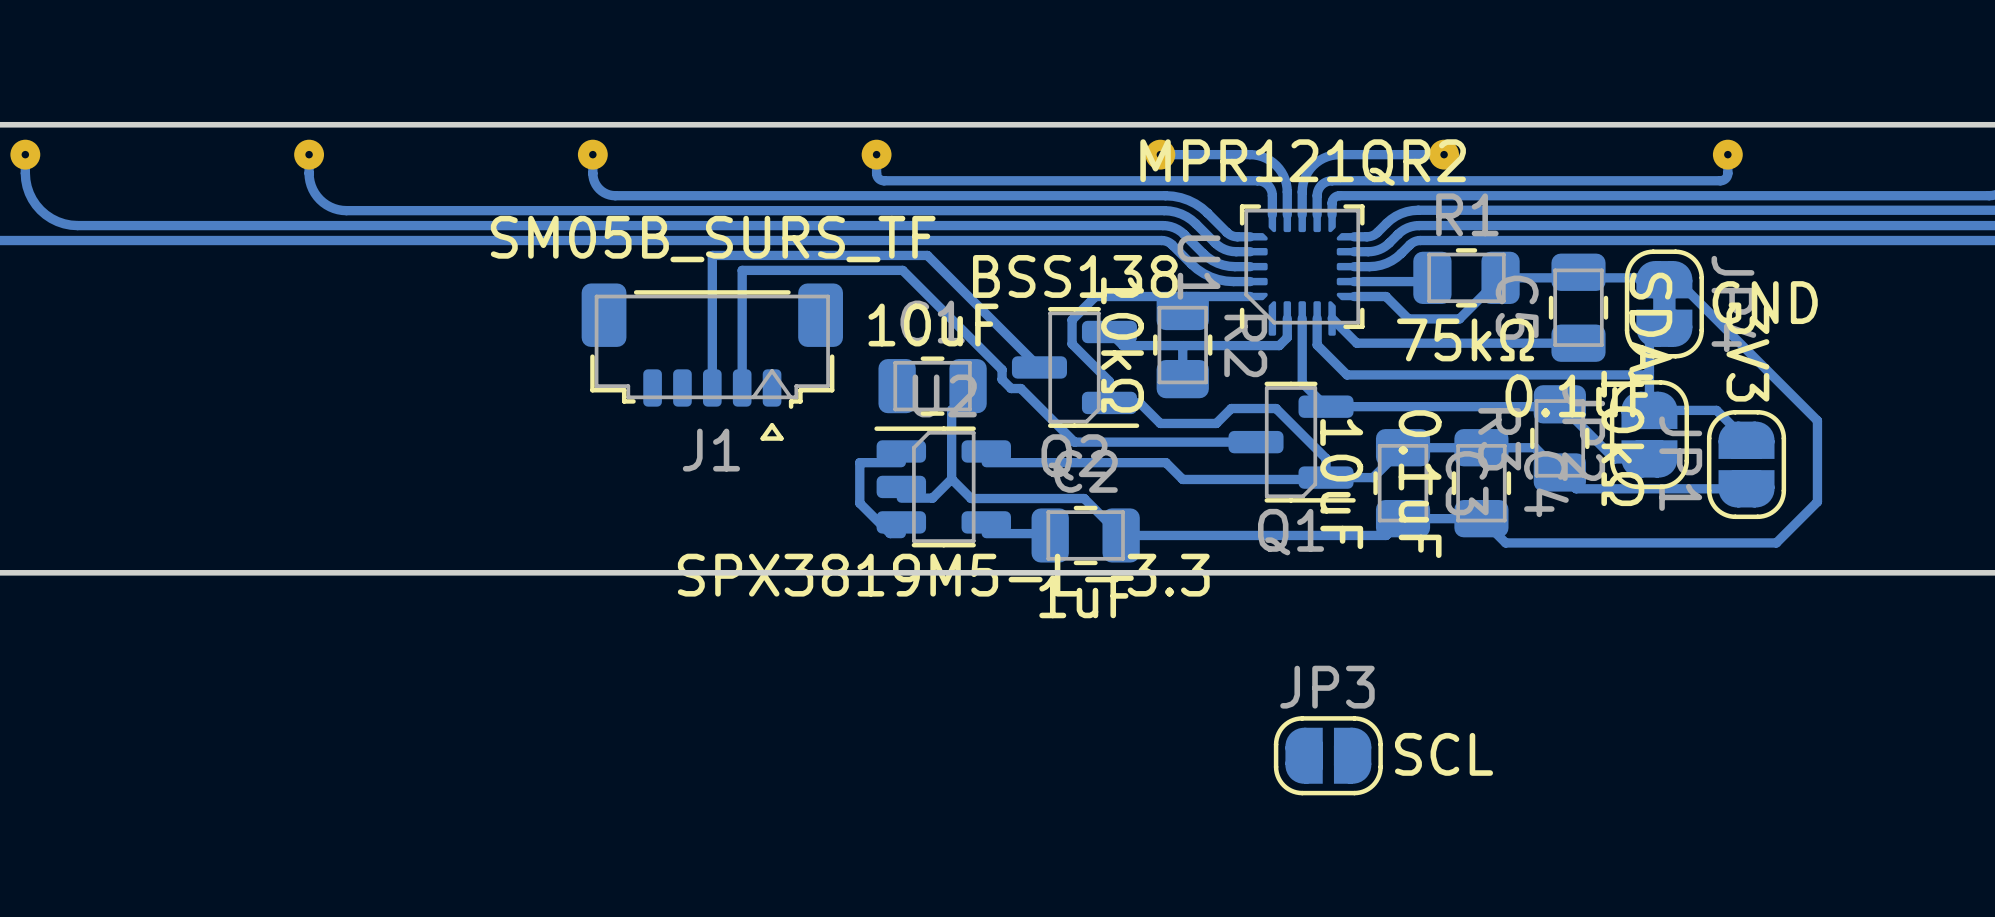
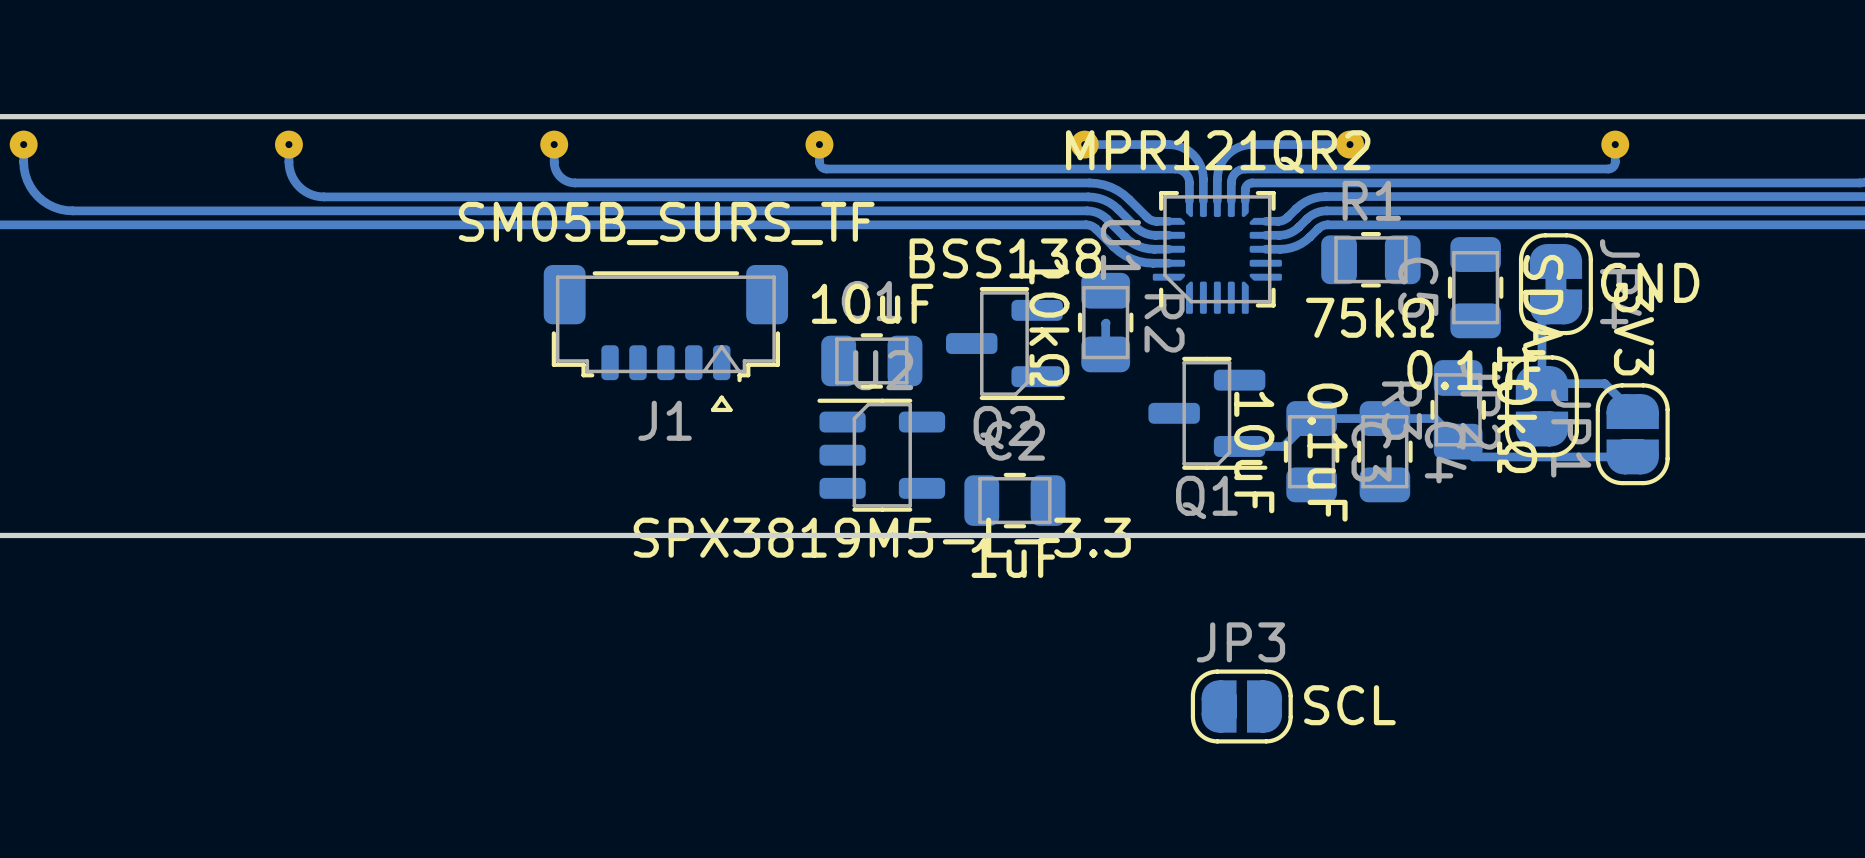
track: (1432, 277) (1428, 281) (1354, 281) -> none
track: (1250, 296) (1095, 296) (1072, 319) (1072, 344) (1109, 381) (1109, 402) (1139, 402) (1160, 423) (1216, 423) (1231, 408) (1276, 408) (1326, 458) (1326, 477) (1324, 479) (1182, 479) (1165, 462) (986, 462) -> none
track: (1354, 296) (1385, 296) (1408, 318) (1459, 318) (1500, 277) (1572, 277) (1578, 272) (1584, 277) (1662, 277) (1664, 279) (1676, 279) (1817, 420) (1817, 501) (1776, 542) (1505, 542) (1481, 518) (1403, 518) (1386, 535) (1121, 535) (1084, 498) (971, 498) (951, 479) -> none
track: (1287, 318) (1287, 337) (1279, 345) (1123, 345) (1109, 331) -> none
track: (1302, 318) (1302, 382) (1326, 406) (1557, 406) (1559, 404) (1614, 458) (1649, 458) -> none
track: (1317, 318) (1317, 345) (1347, 374) (1645, 374) (1649, 371) -> none
track: (1332, 318) (1356, 343) (1578, 343) -> none
track: (1039, 367) (927, 255) (712, 255) (712, 387) -> none
track: (742, 387) (742, 270) (902, 270) (1002, 369) (1002, 379) (1011, 388) (1020, 388) (1074, 442) (1256, 442) -> none
track: (968, 393) (951, 410) (951, 479) -> none
track: (901, 462) (859, 462) (859, 503) (890, 533) (901, 533) -> none
track: (951, 479) (932, 498) (901, 498) -> none
track: (986, 533) (1048, 533) (1050, 535) -> none

